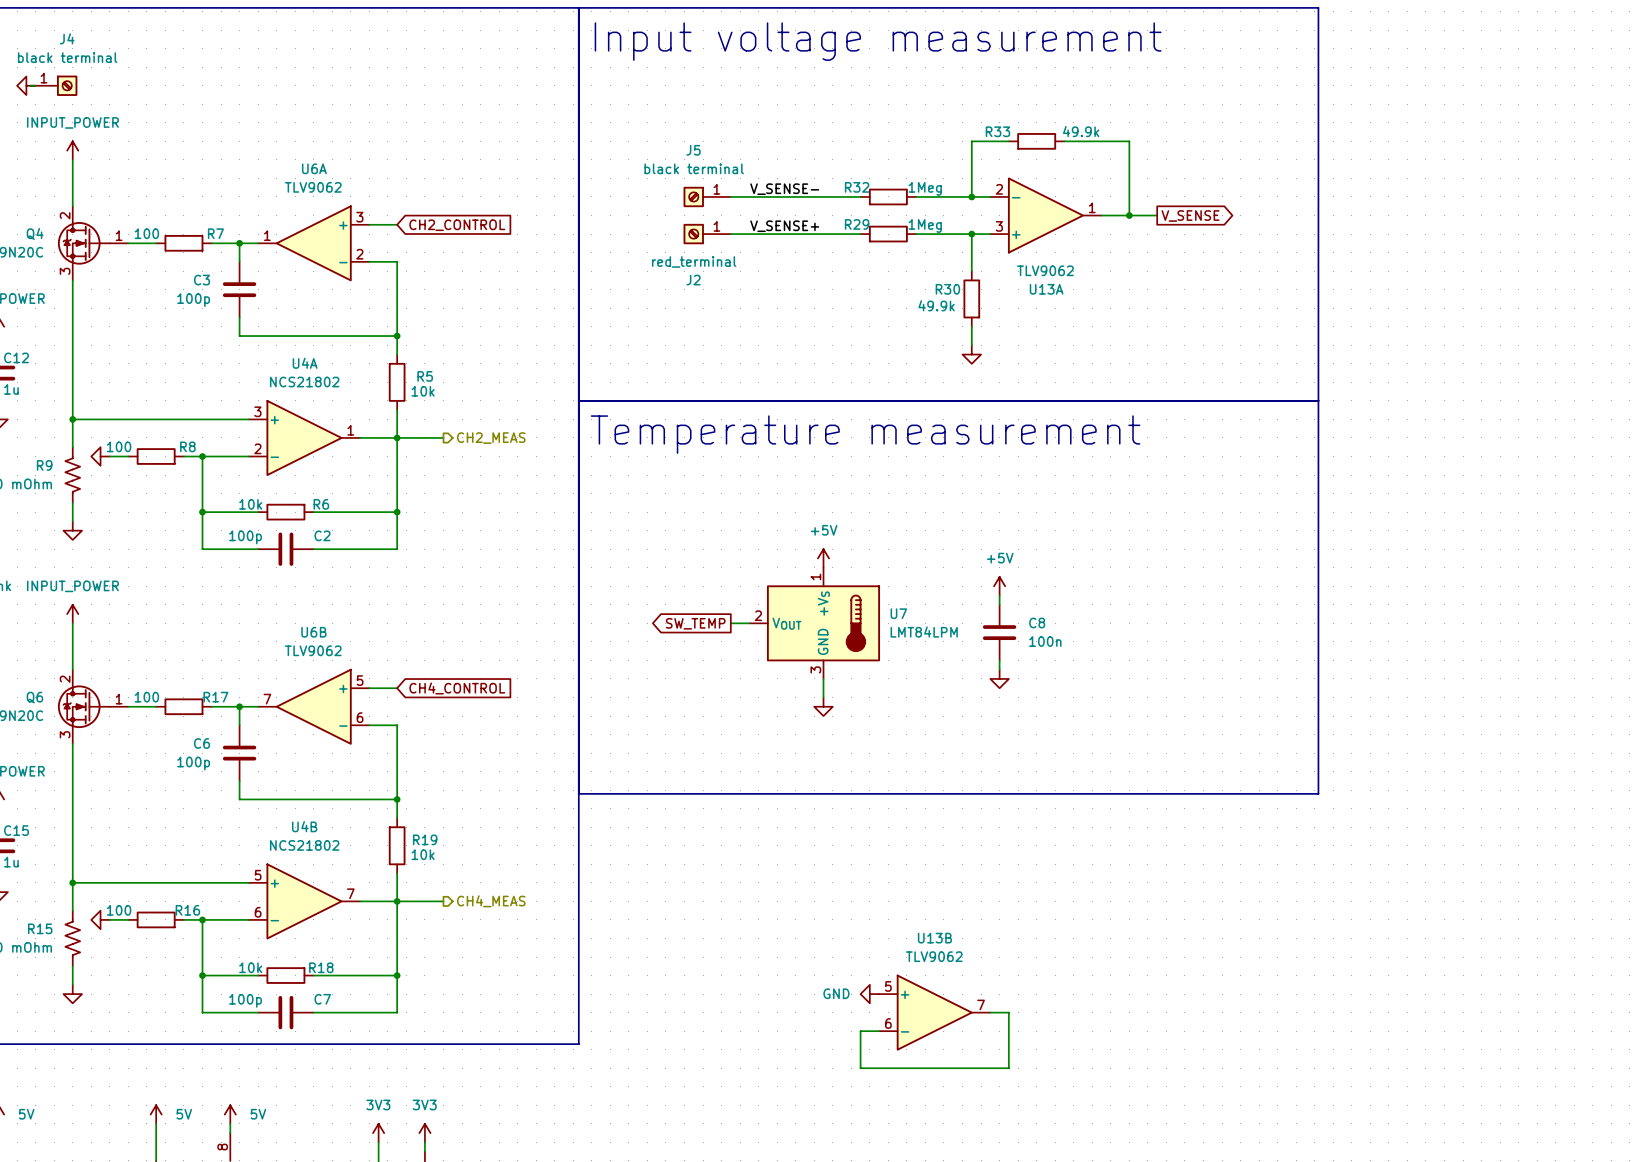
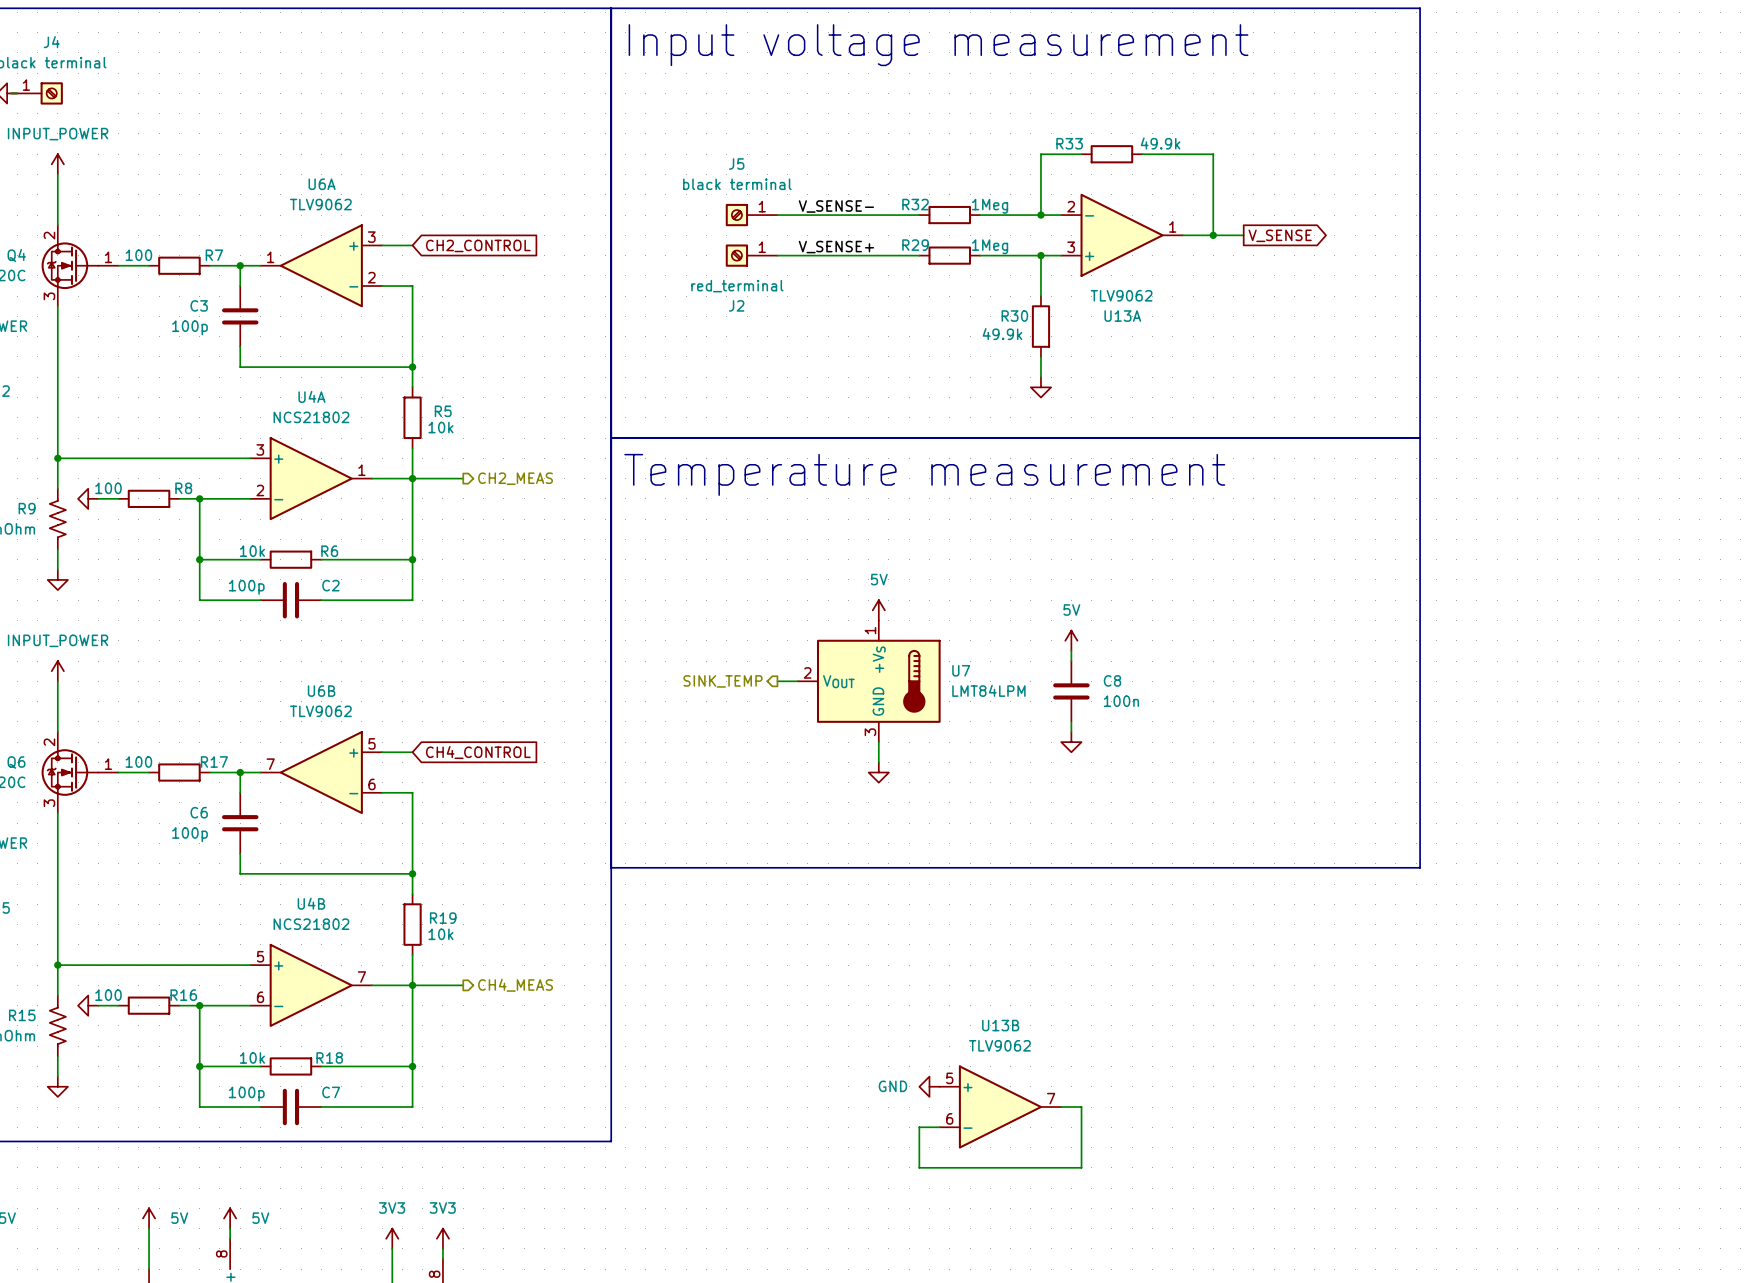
power symbol: +5V (823, 558) -> 5V (878, 610)
power symbol: +5V (999, 586) -> 5V (1071, 640)
hierarchical label: none -> SINK_TEMP (722, 681)
global label: SW_TEMP (695, 623) -> none

